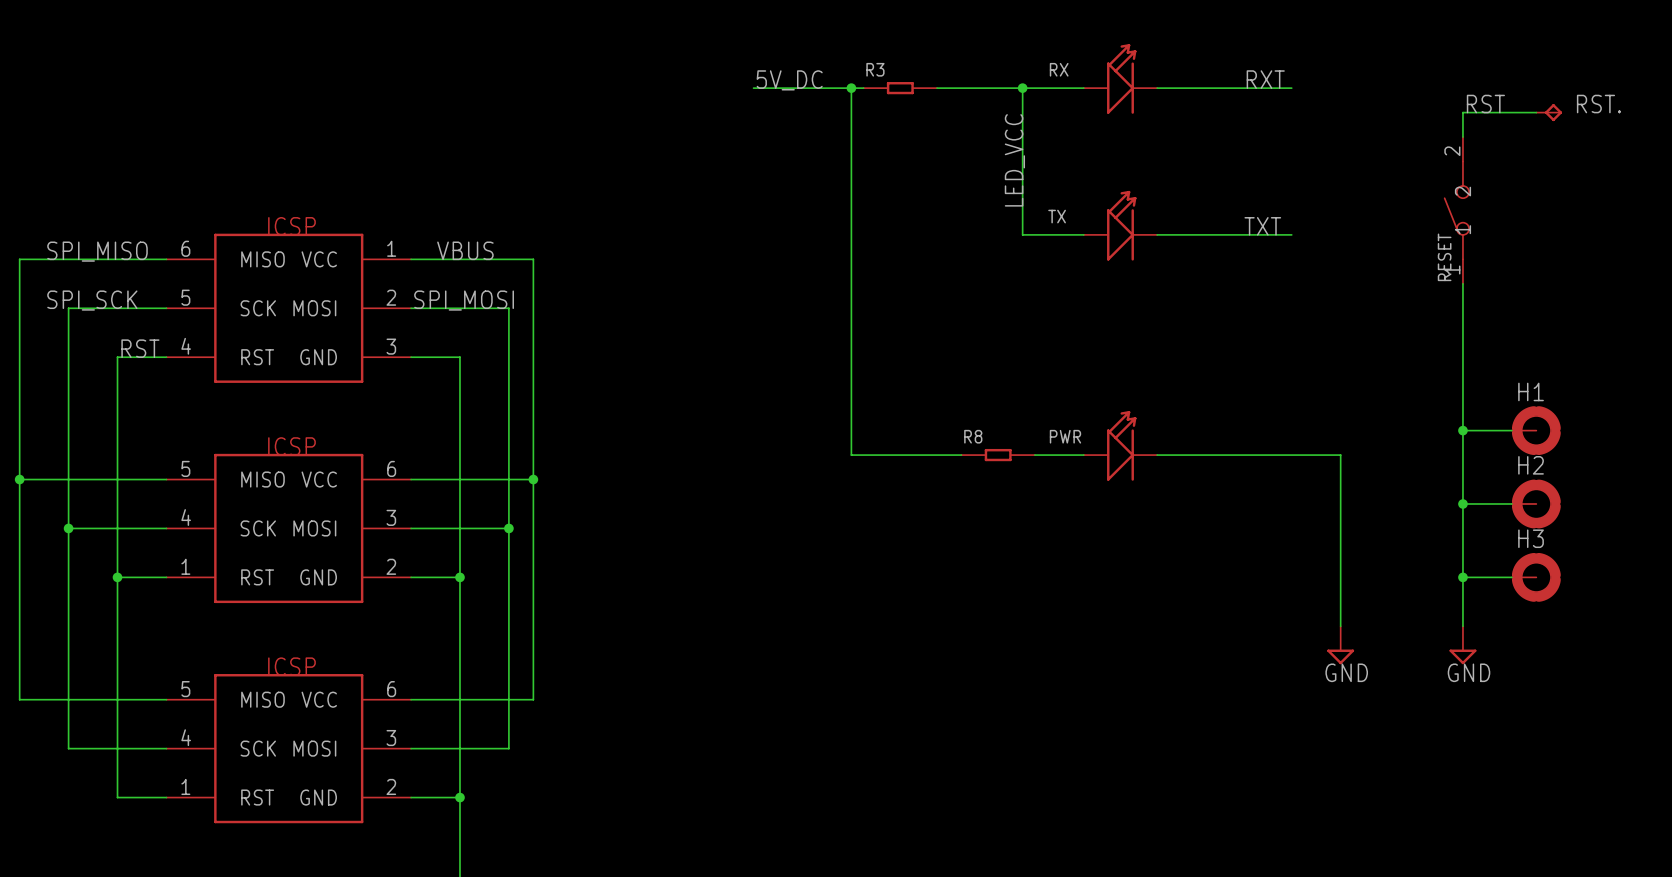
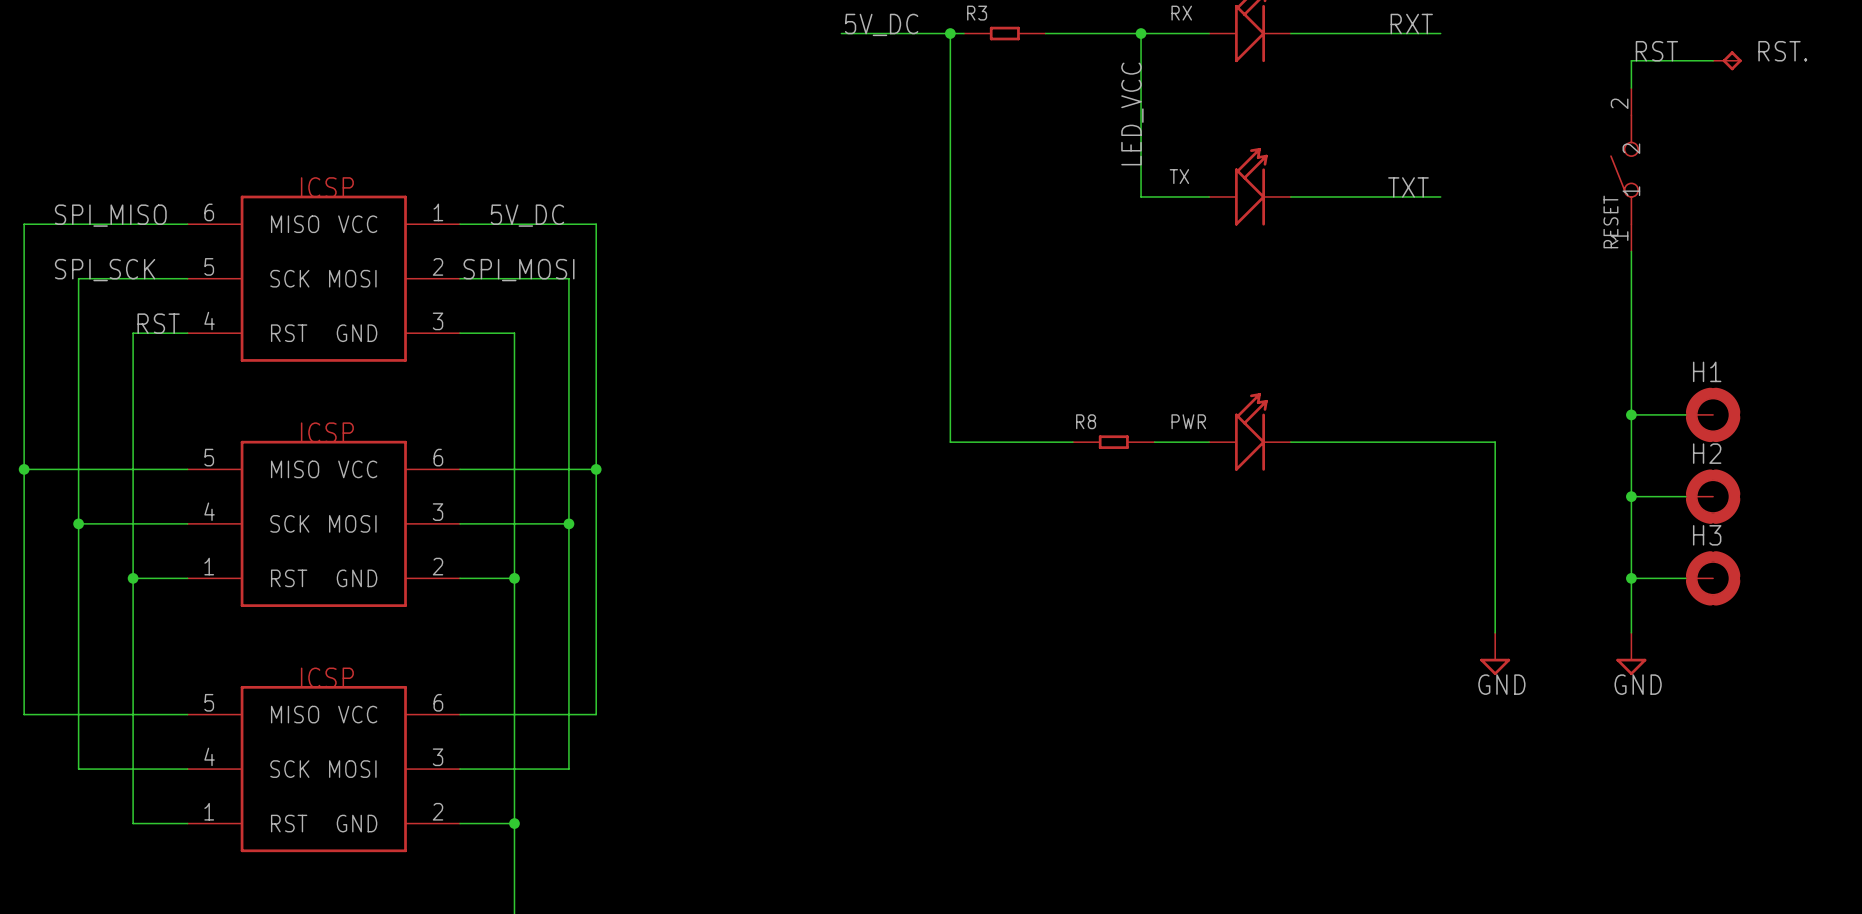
label: VBUS (465, 250) -> 5V_DC (527, 215)

